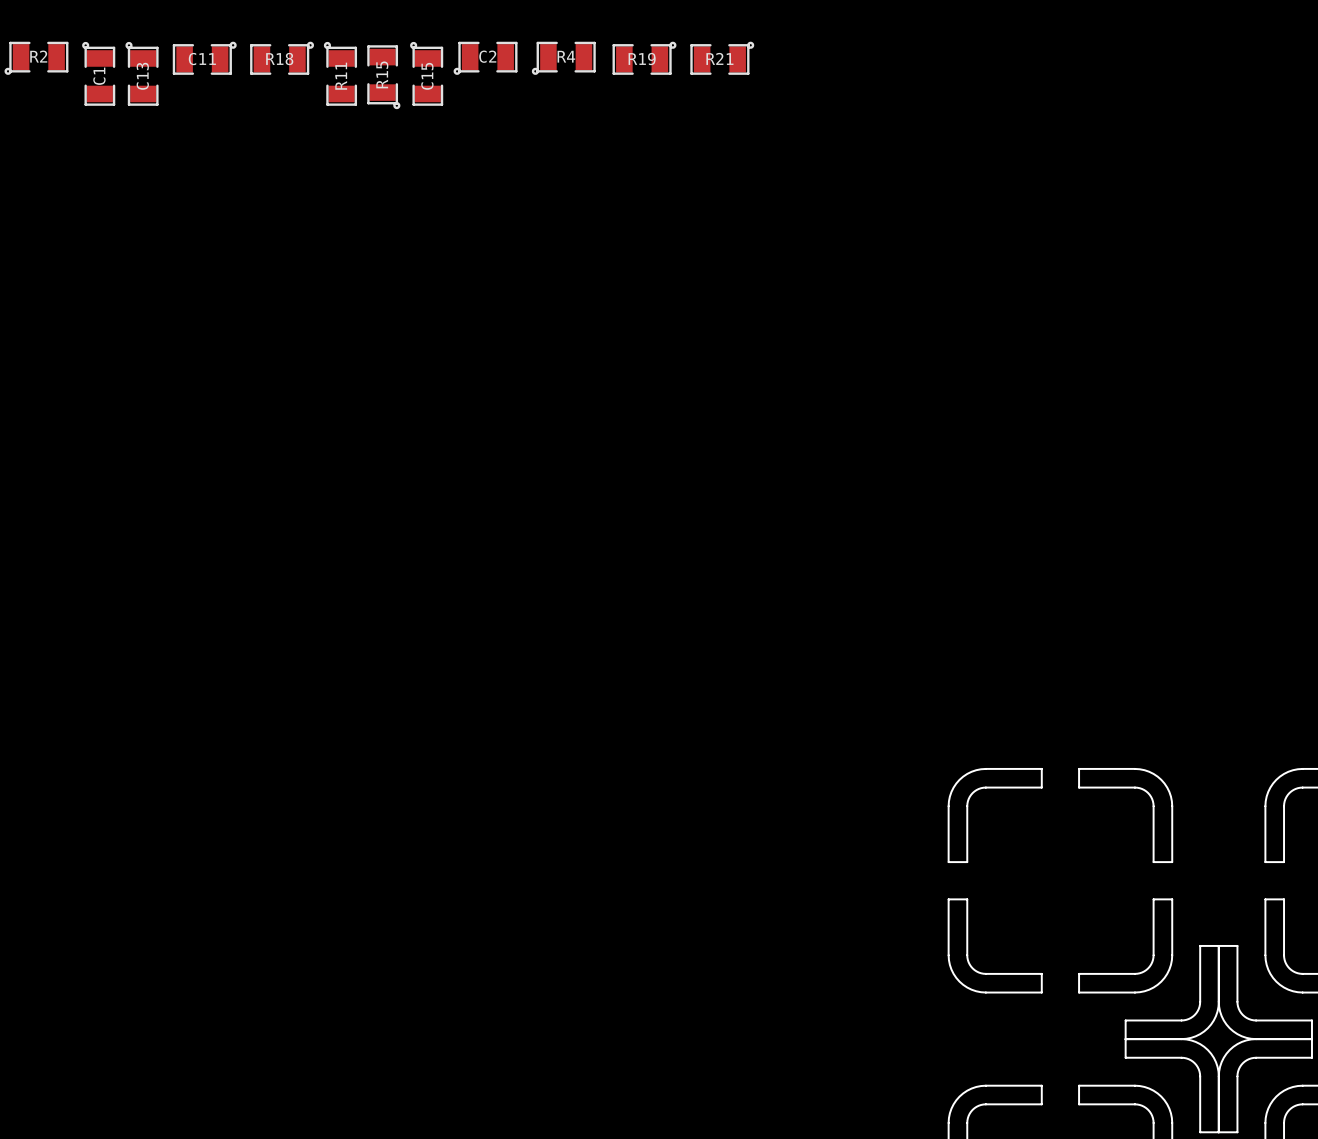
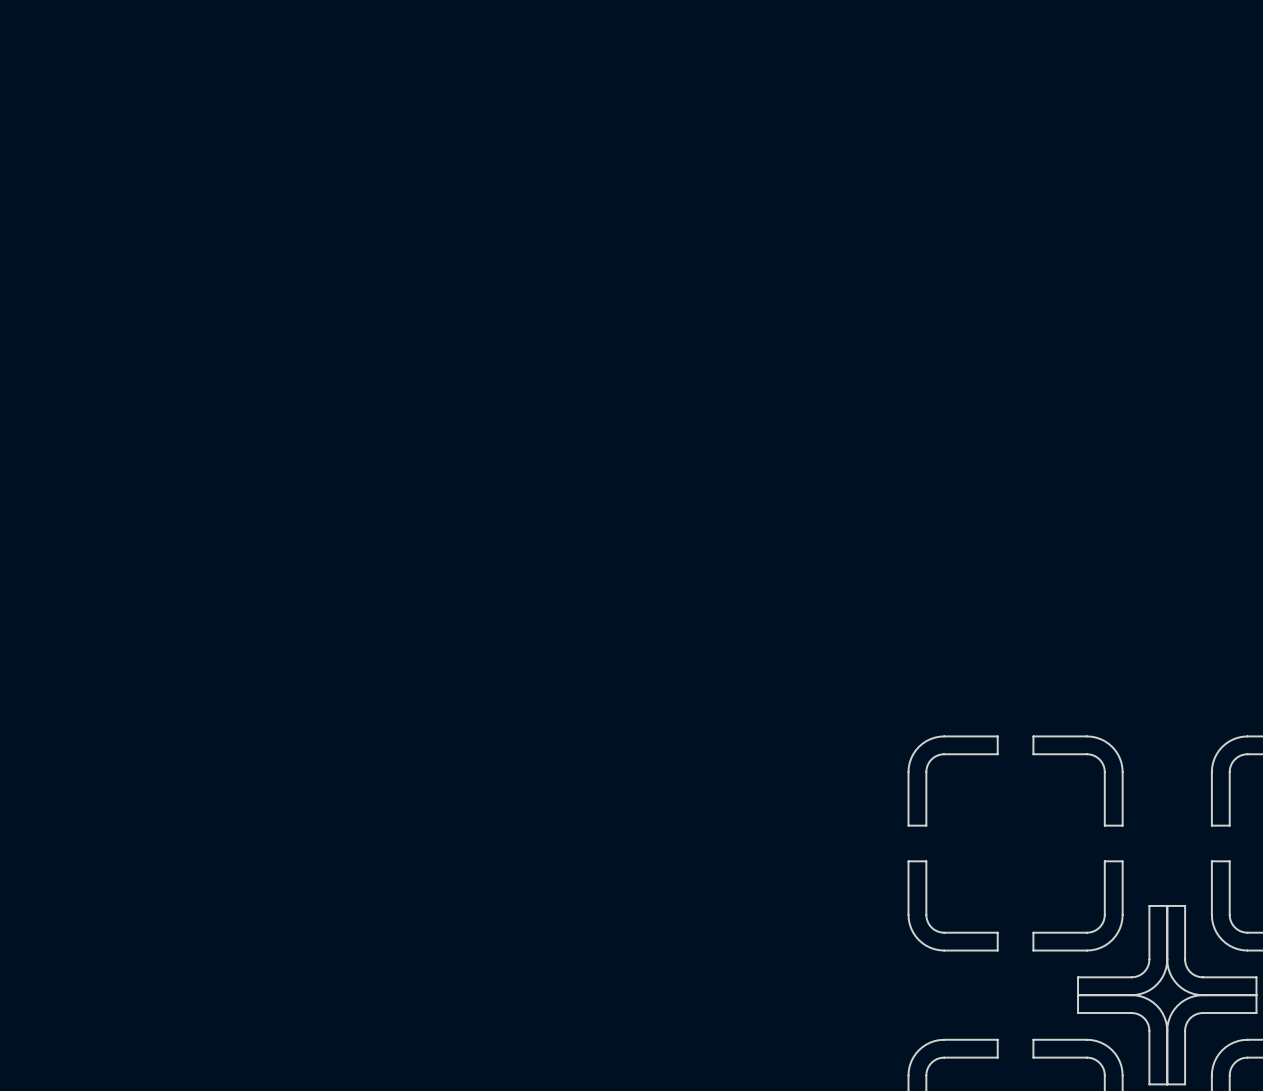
R2: (36, 58) -> none
C11: (204, 58) -> none
R18: (282, 58) -> none
C2: (485, 58) -> none
R4: (563, 58) -> none
R19: (644, 58) -> none
R21: (722, 58) -> none
C1: (98, 73) -> none
C13: (142, 73) -> none
R11: (340, 73) -> none
C15: (426, 73) -> none
R15: (383, 77) -> none

